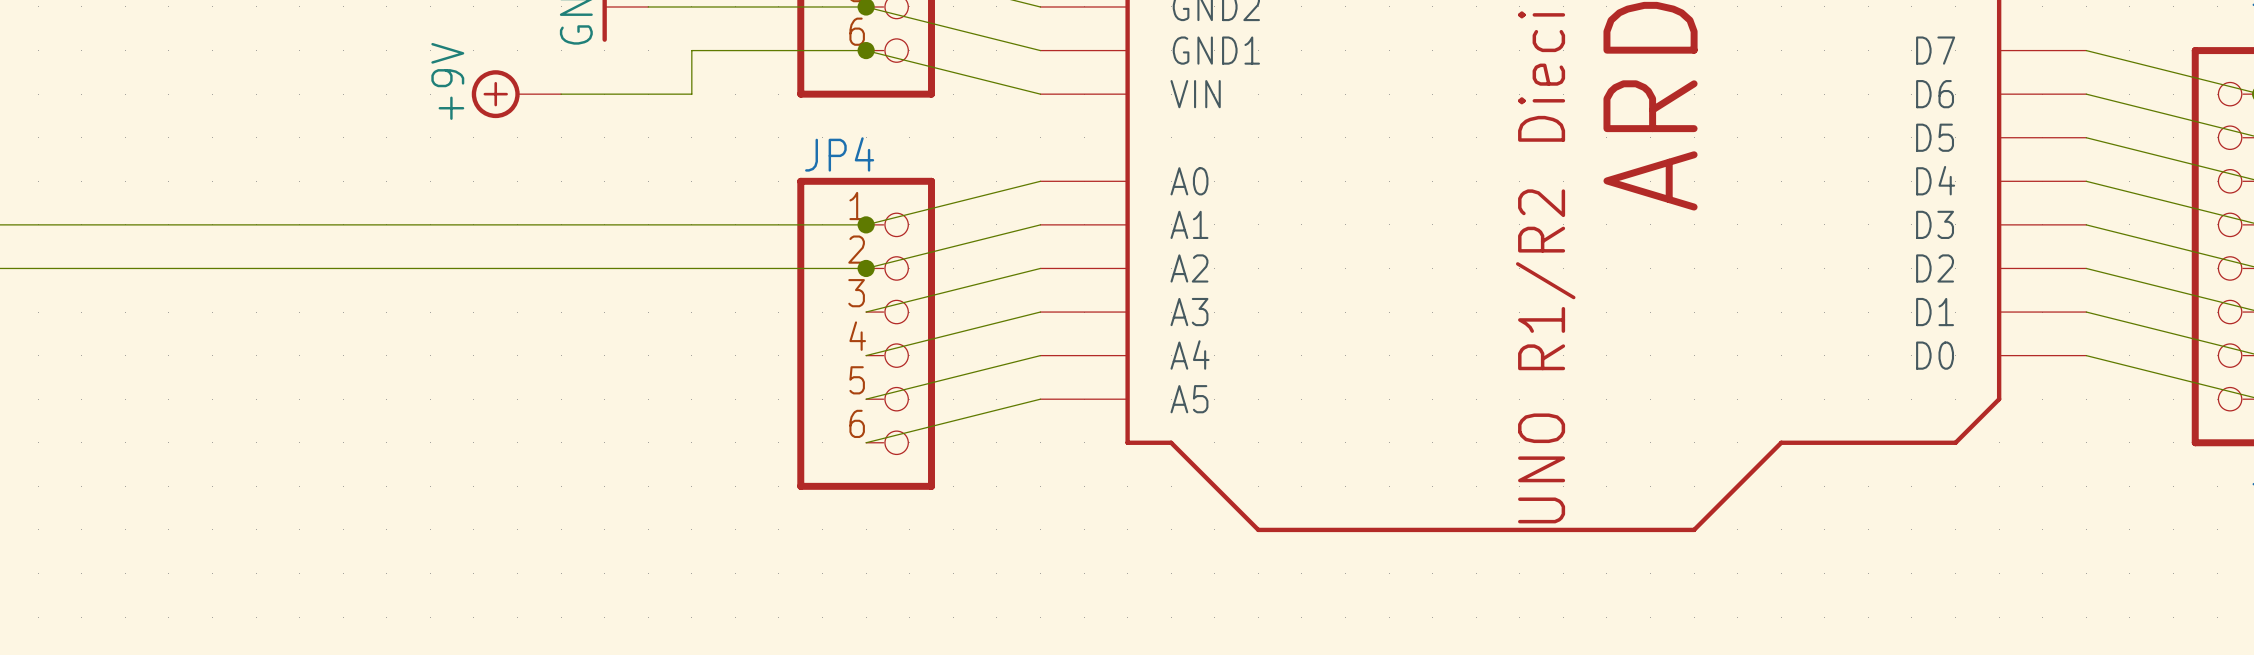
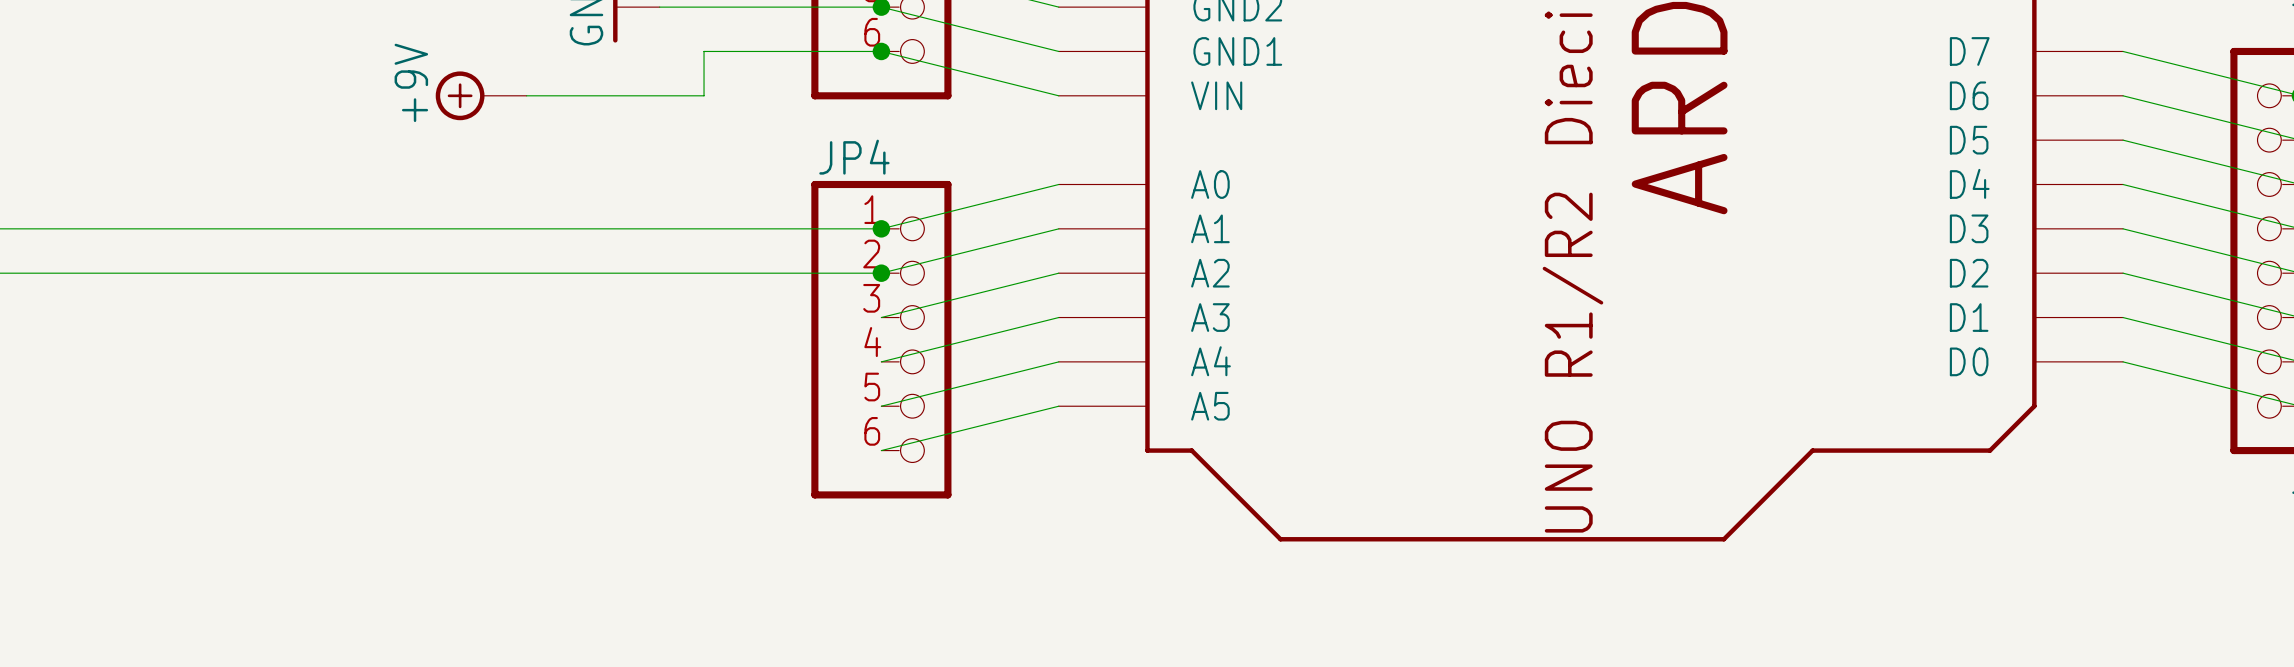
power symbol position: +9V (516, 94) -> +9V (481, 95)

